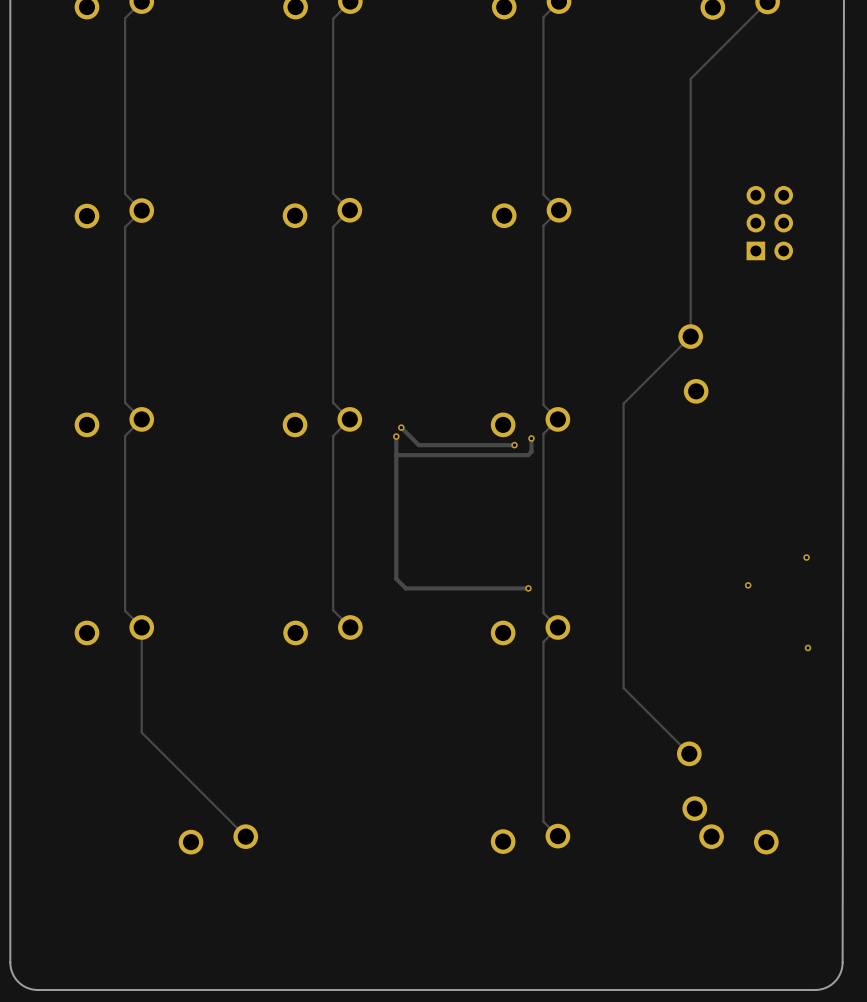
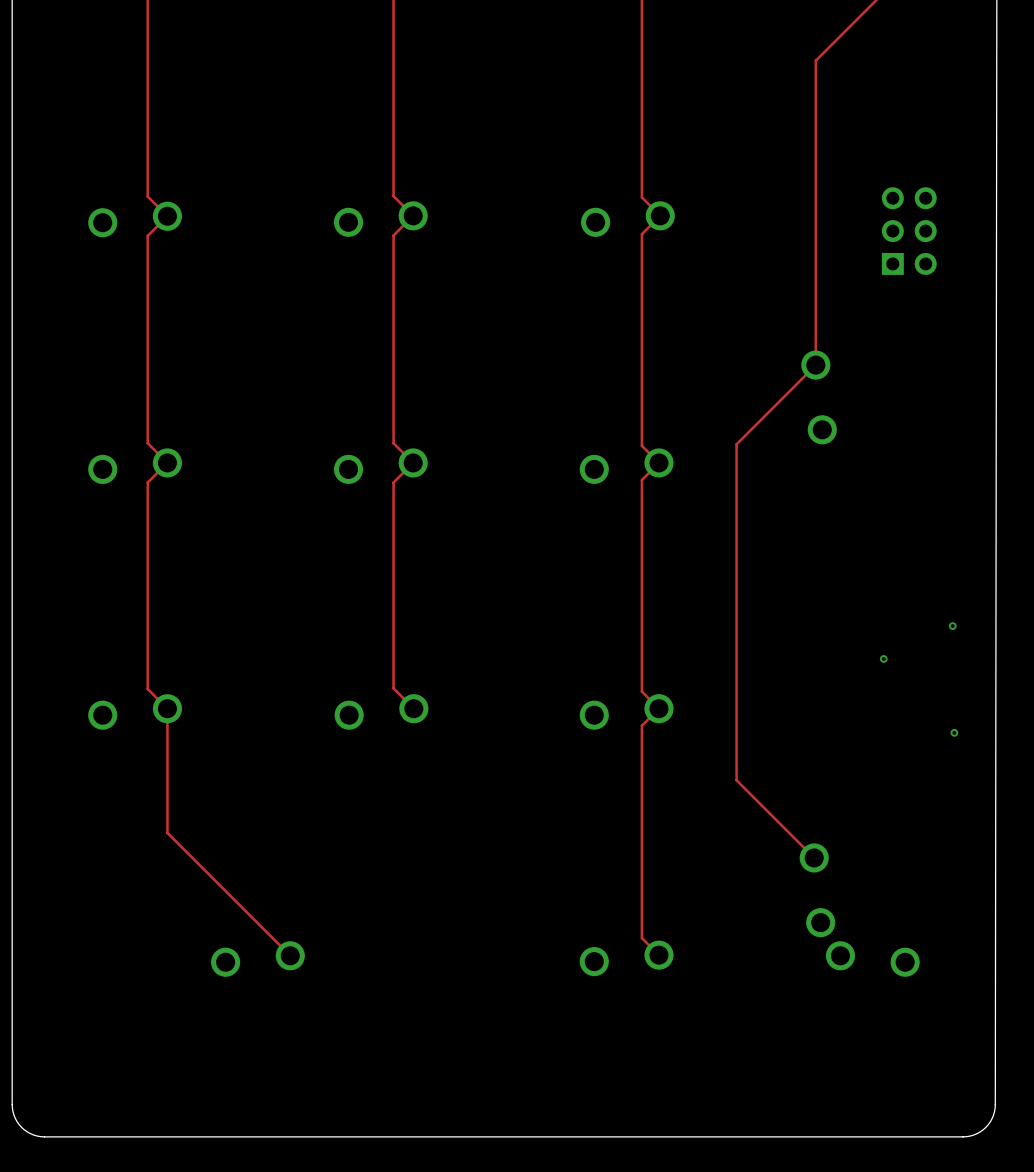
track: (401, 427) (418, 445) (514, 445) -> none
via: (401, 427) -> none
track: (396, 436) (396, 578) (405, 588) (528, 588) -> none
via: (396, 436) -> none
track: (531, 438) (531, 451) (528, 455) (396, 455) -> none
via: (531, 438) -> none
via: (514, 445) -> none
via: (528, 588) -> none

